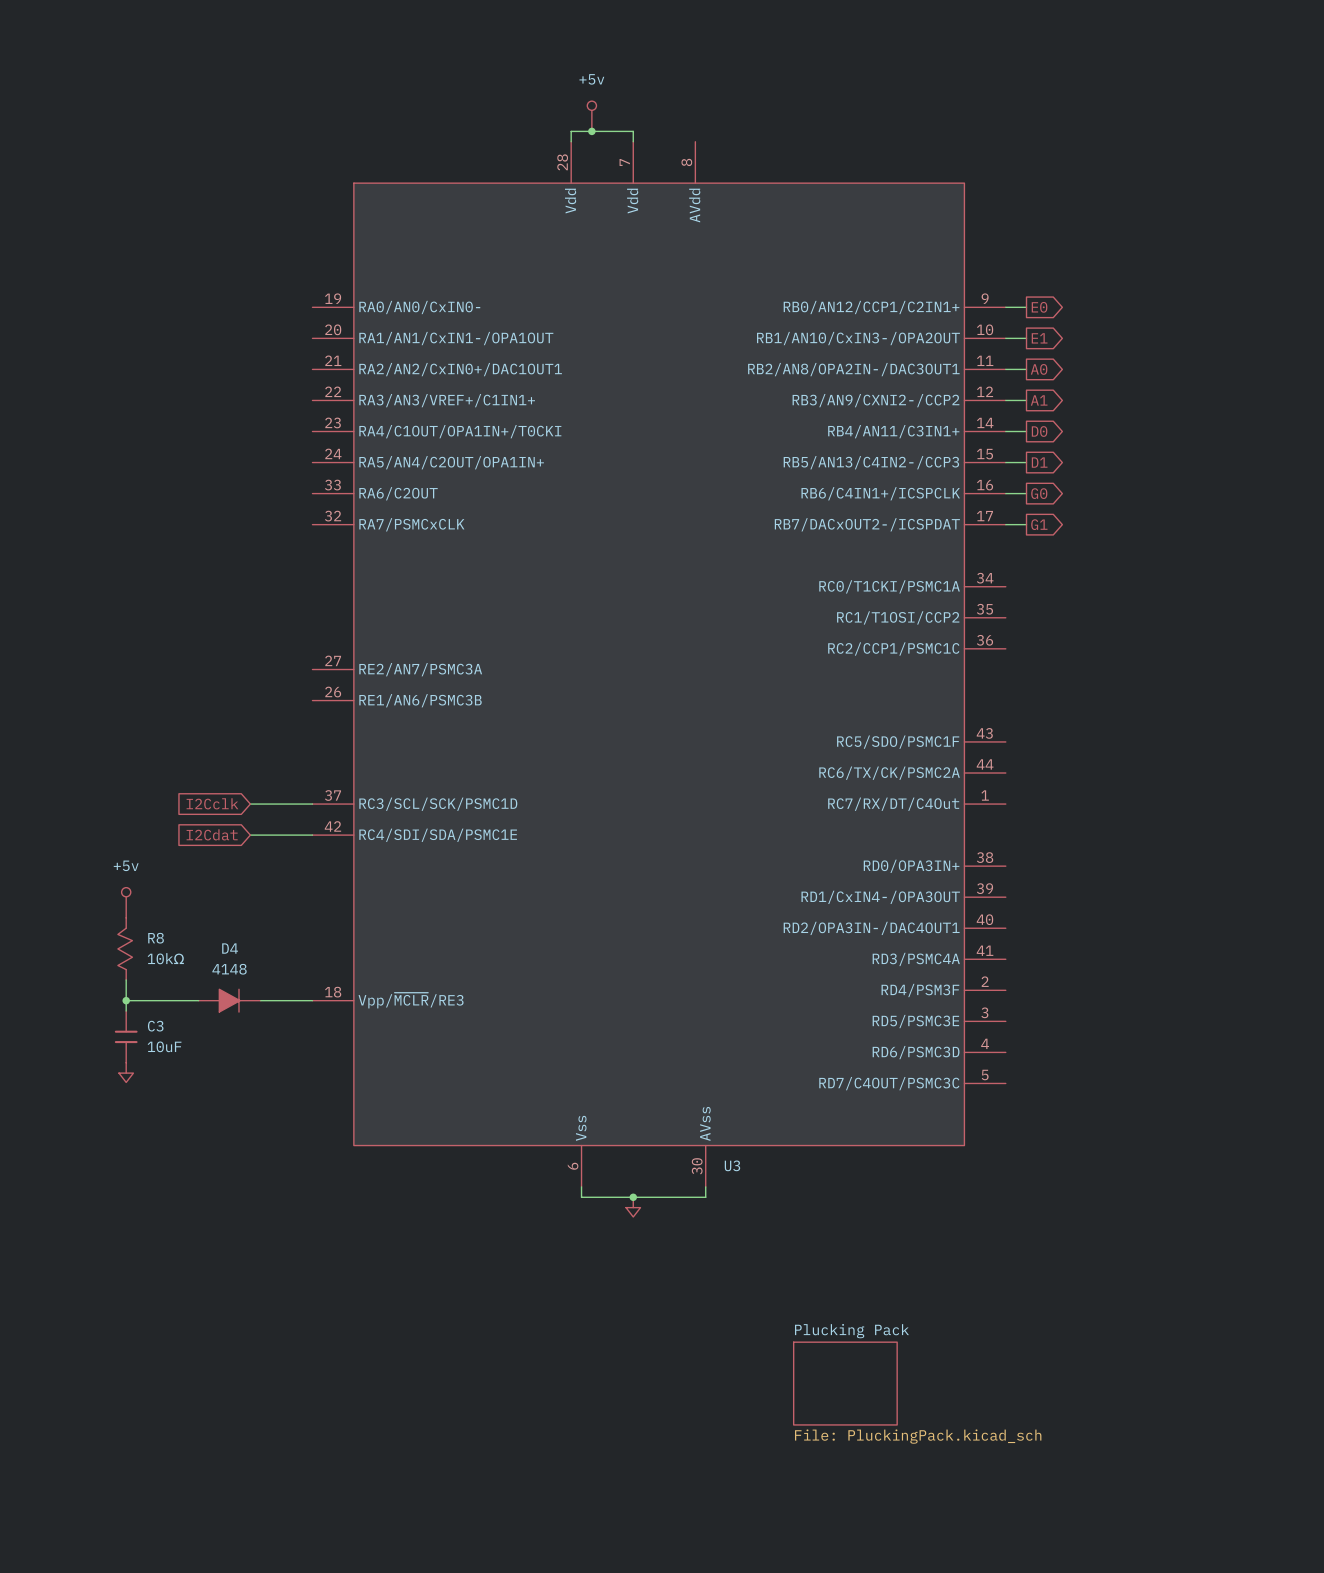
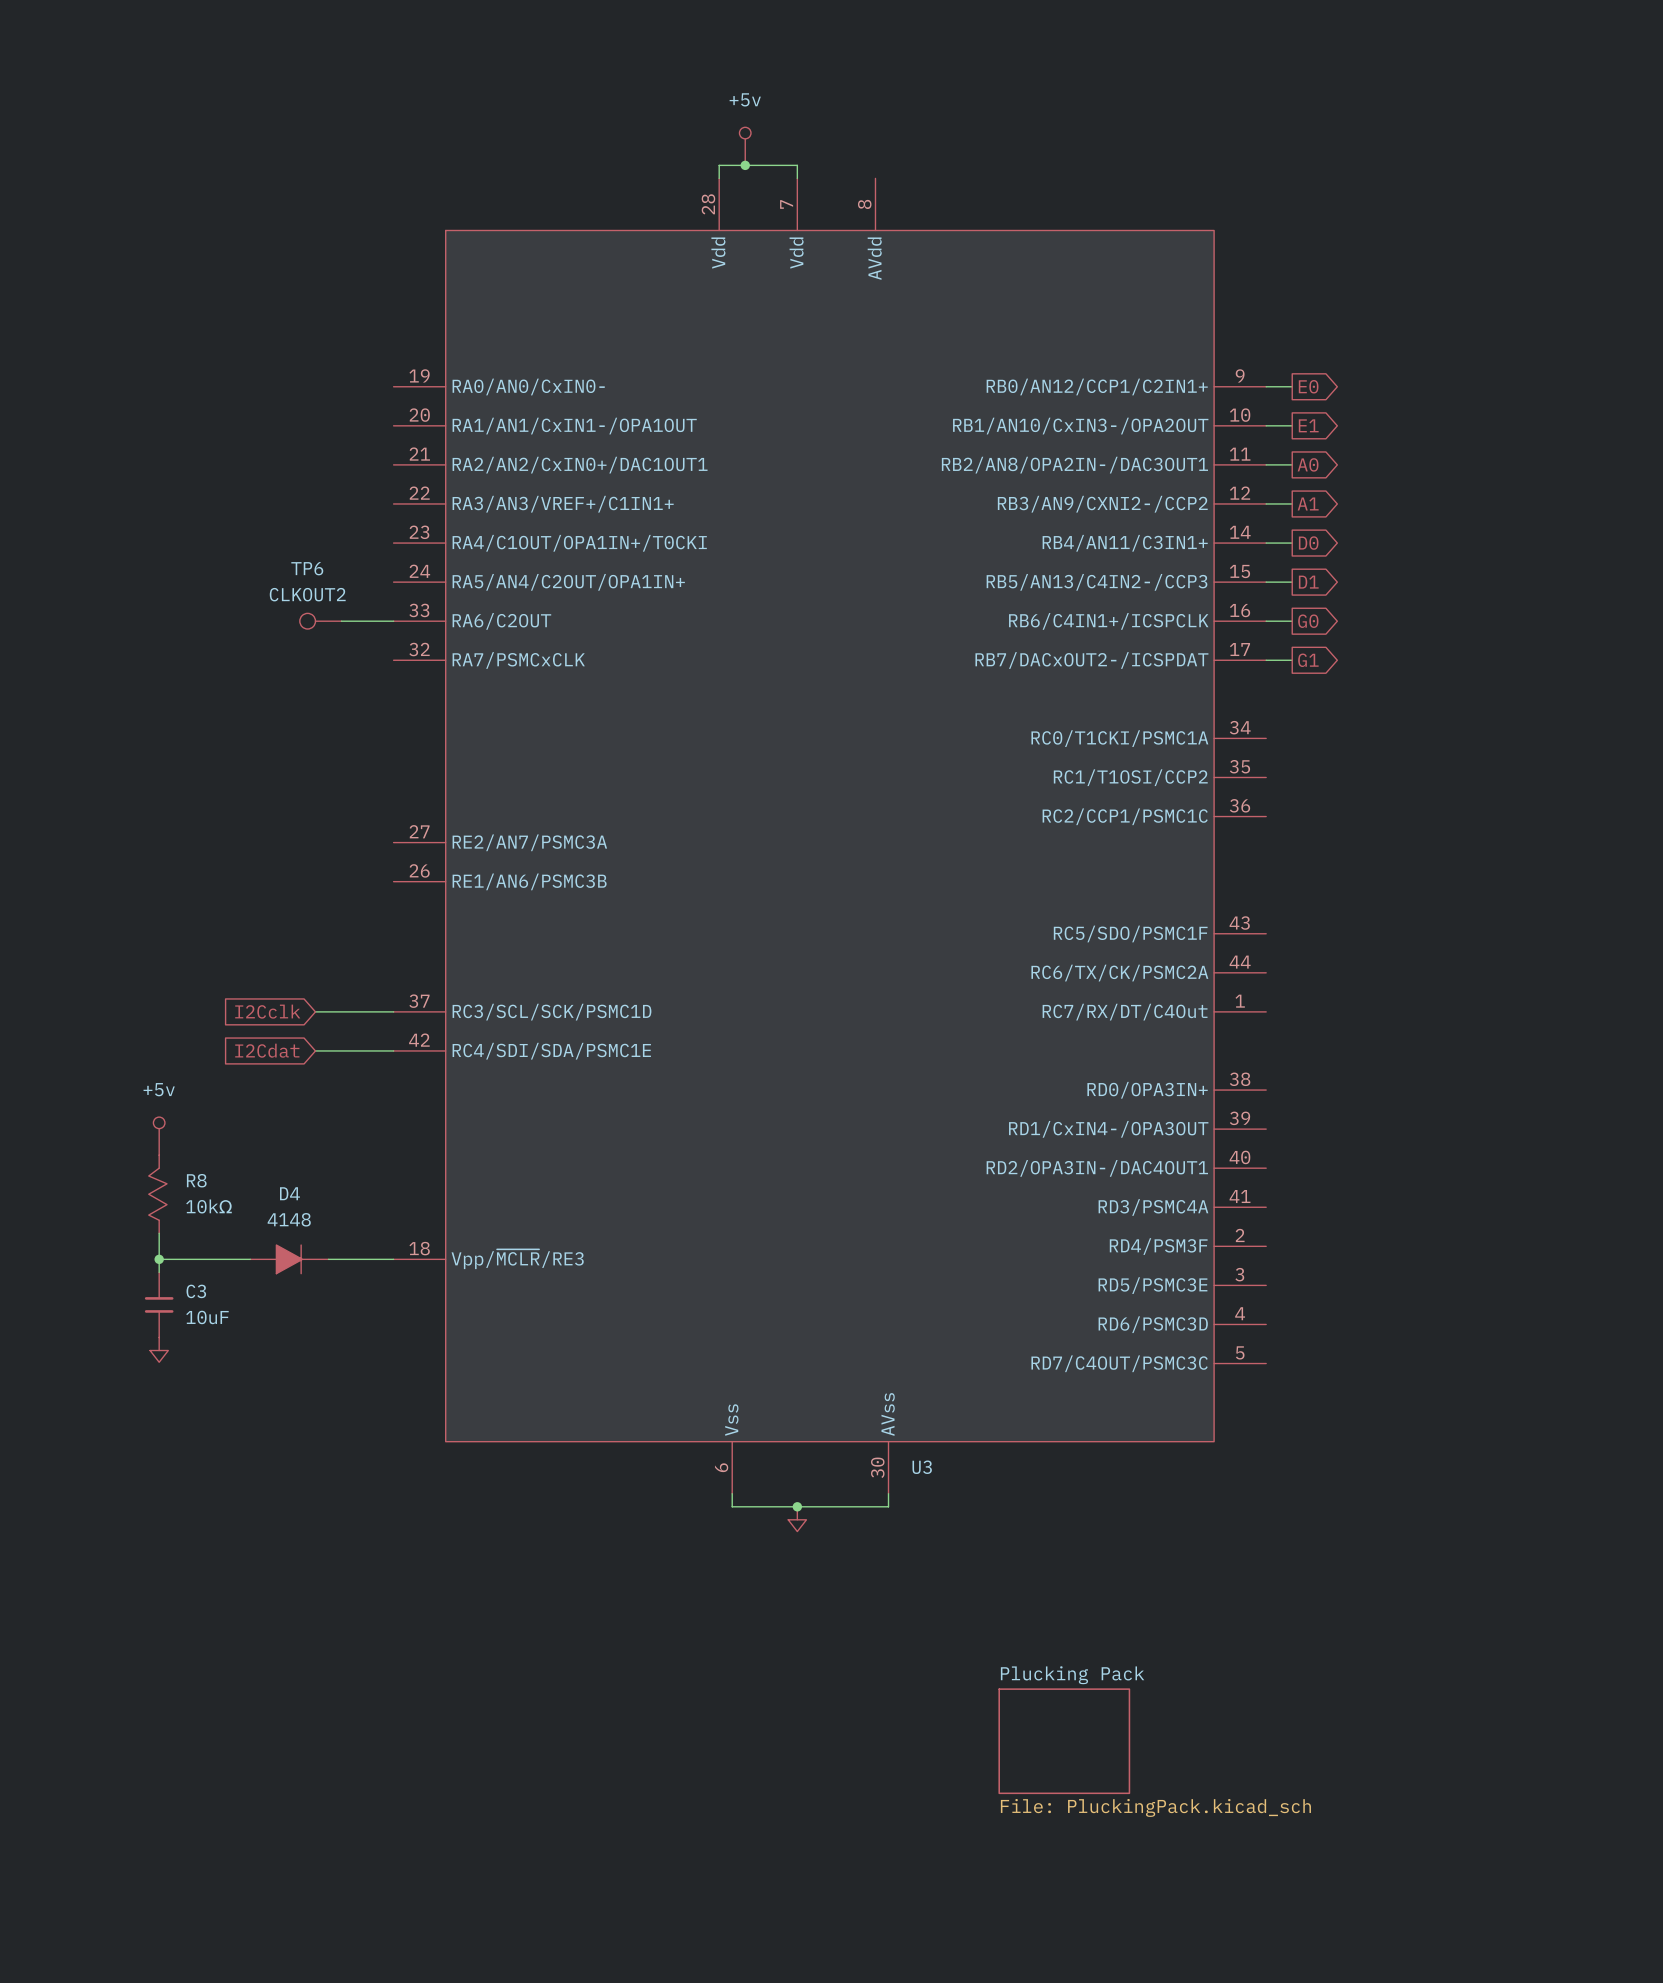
TP6: none -> CLKOUT2 (320, 621)
wire: none -> (341, 621) (393, 621)

